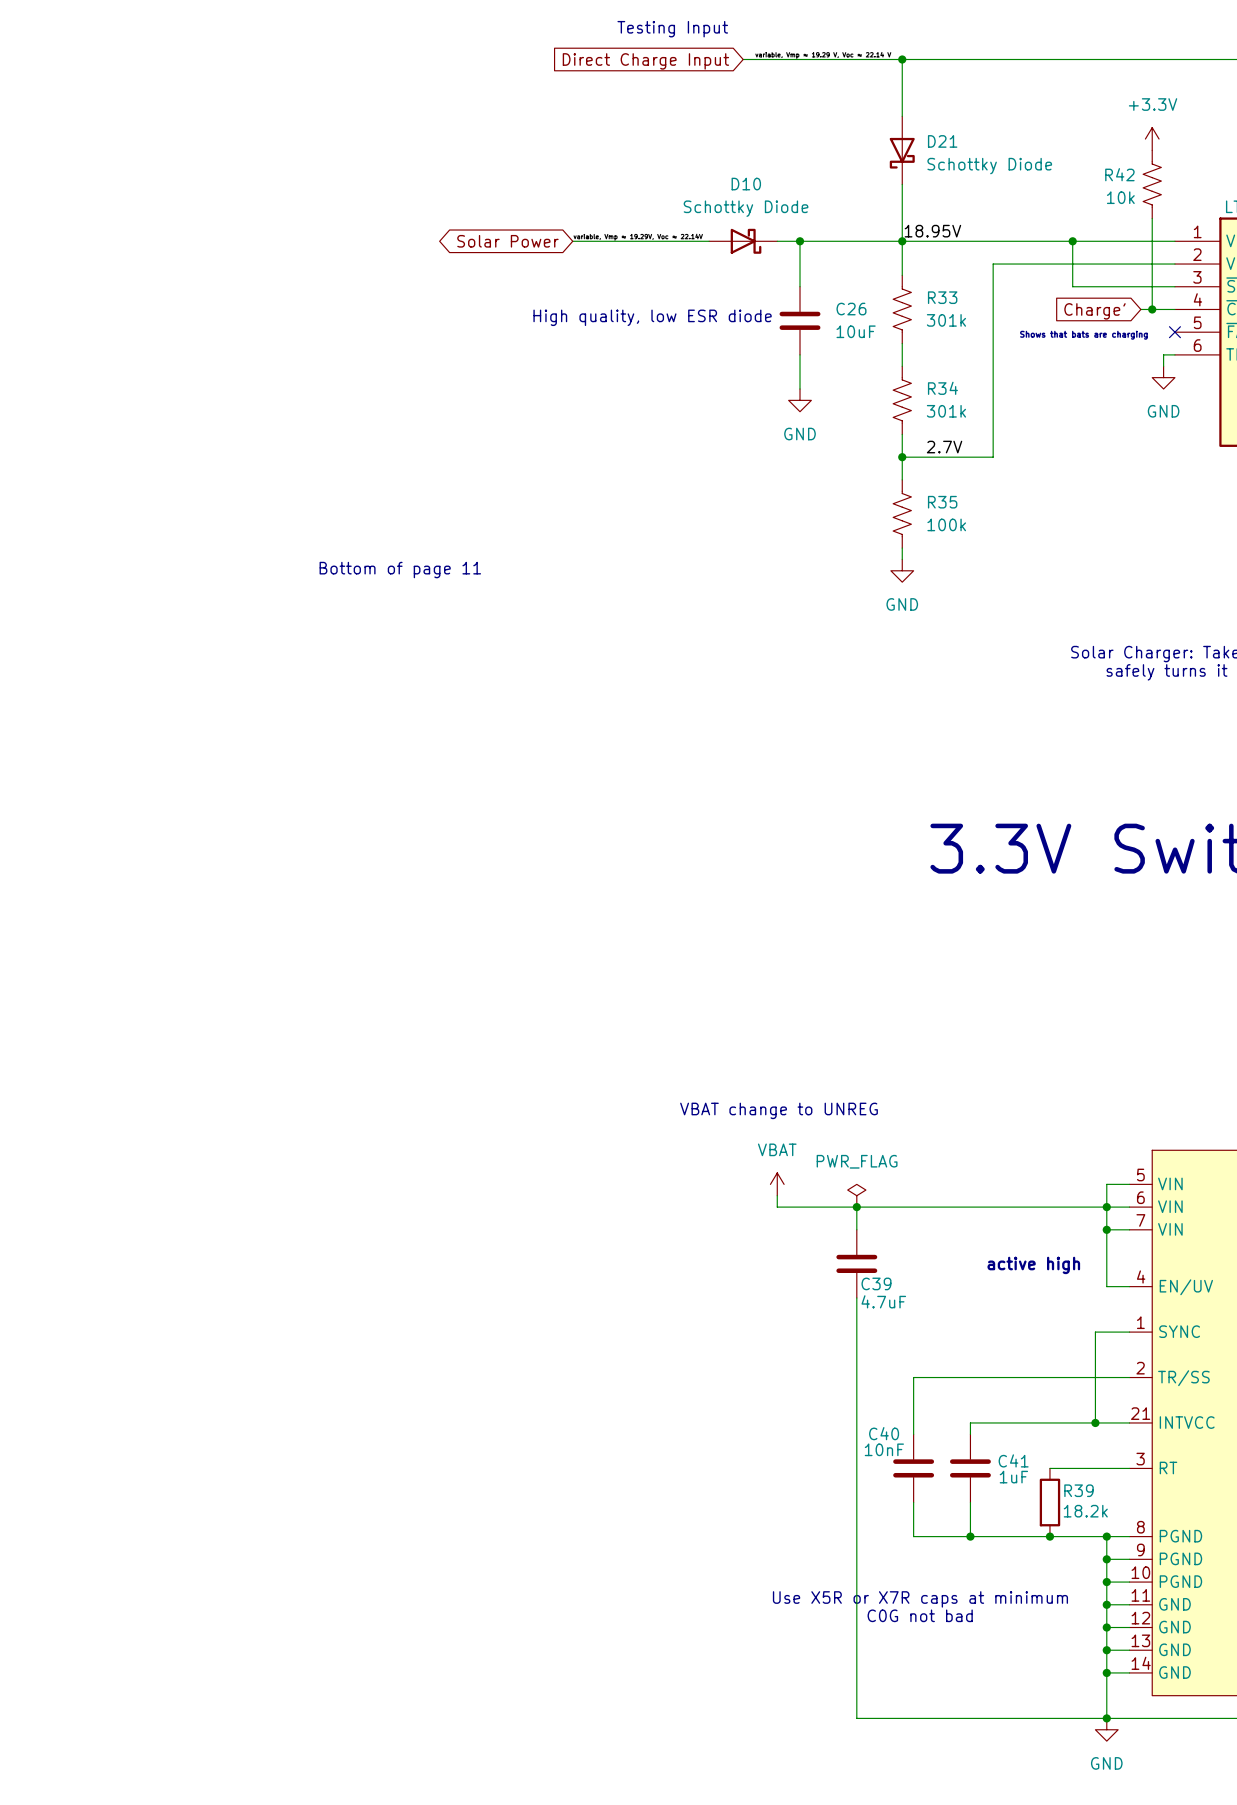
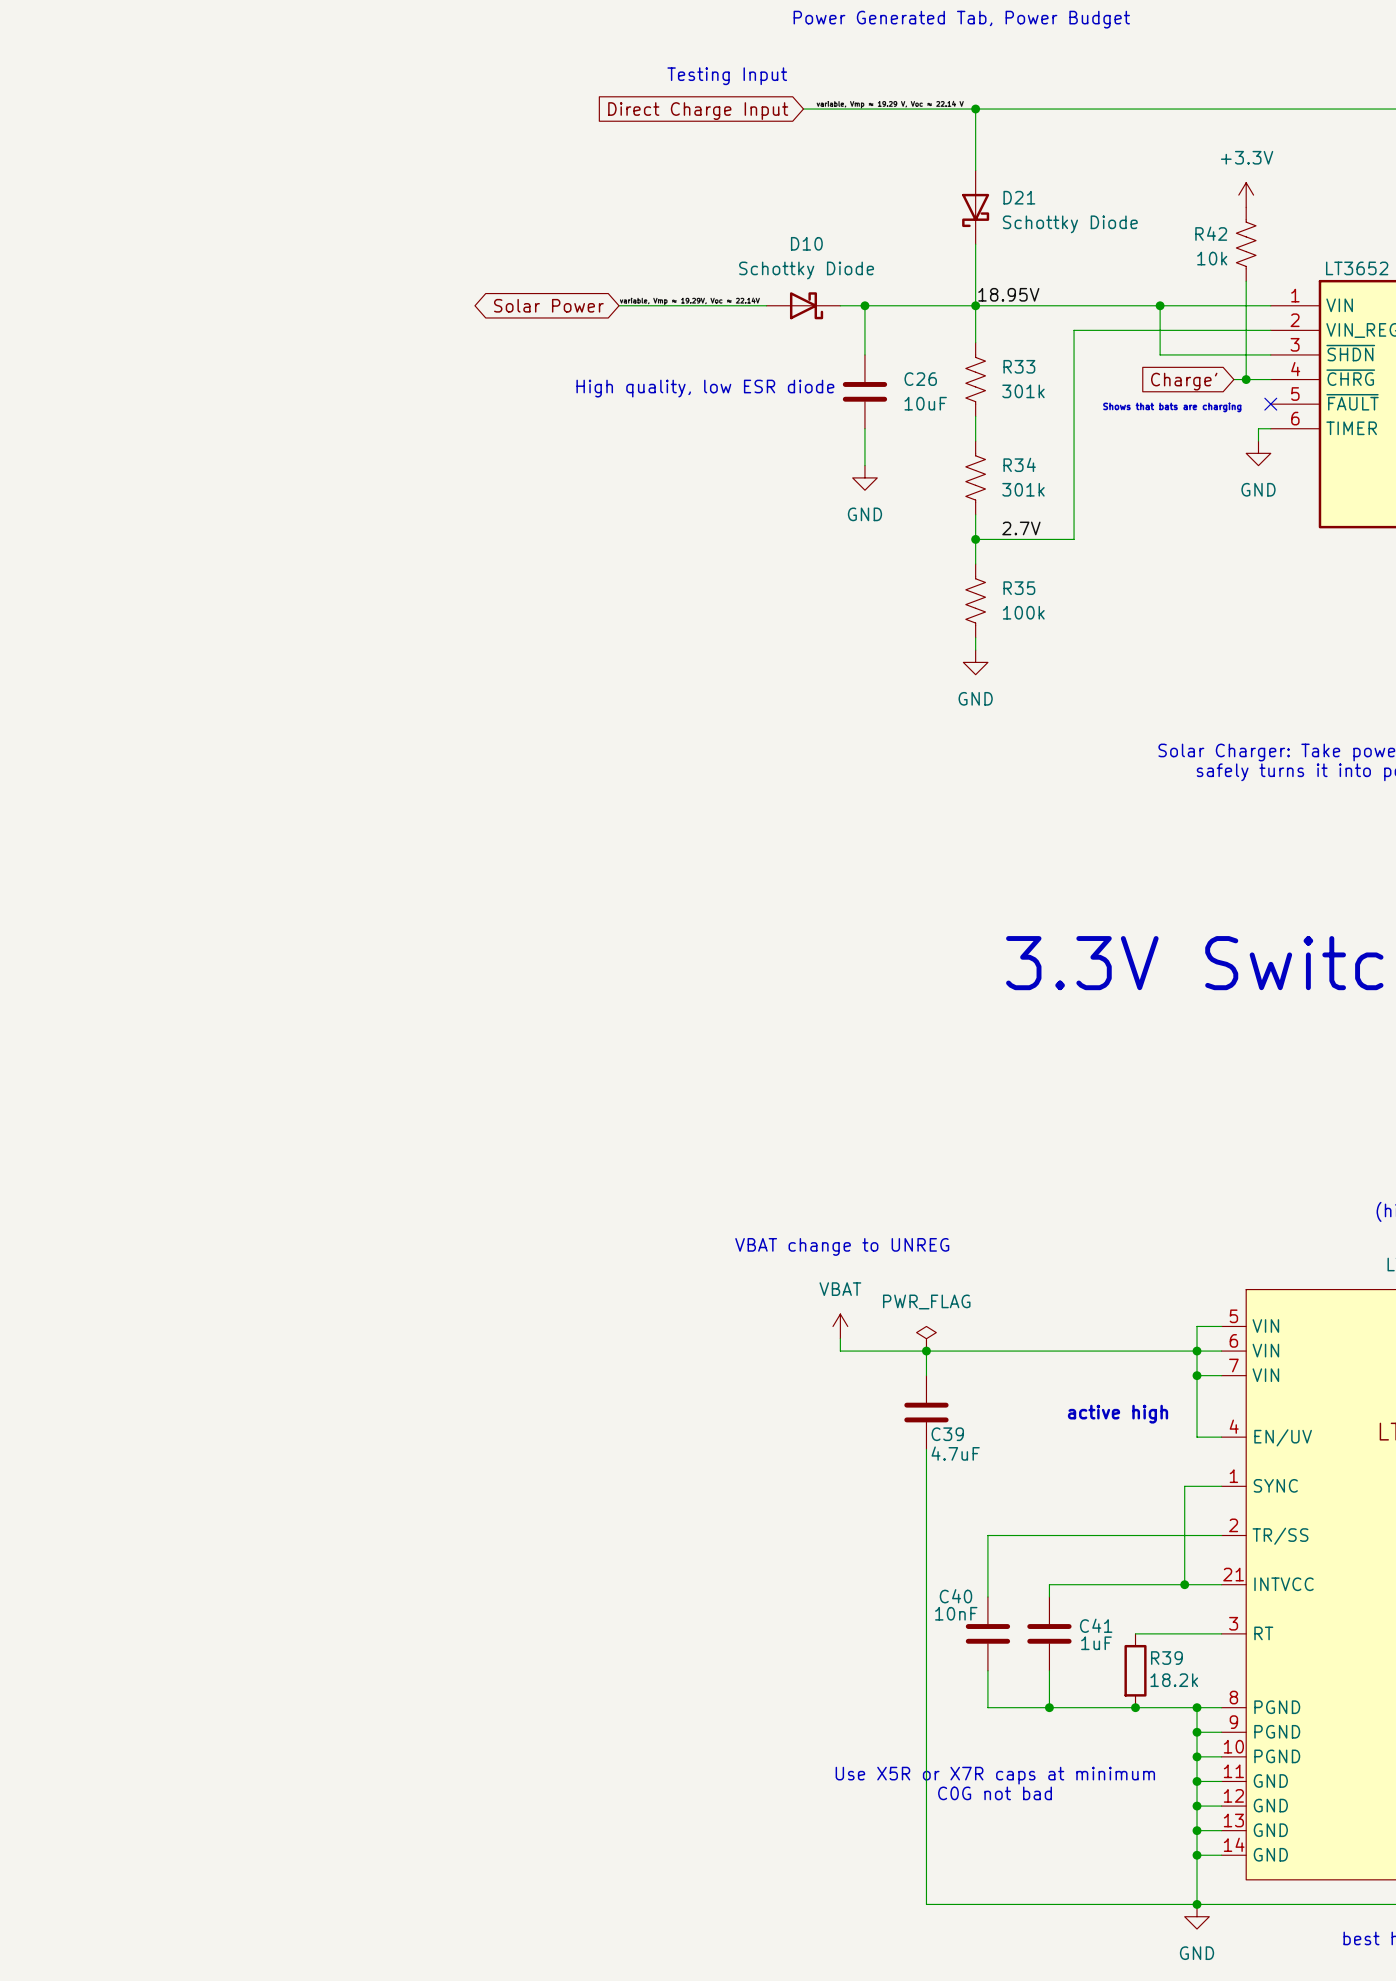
text: Bottom of page 11 (400, 570) -> none

